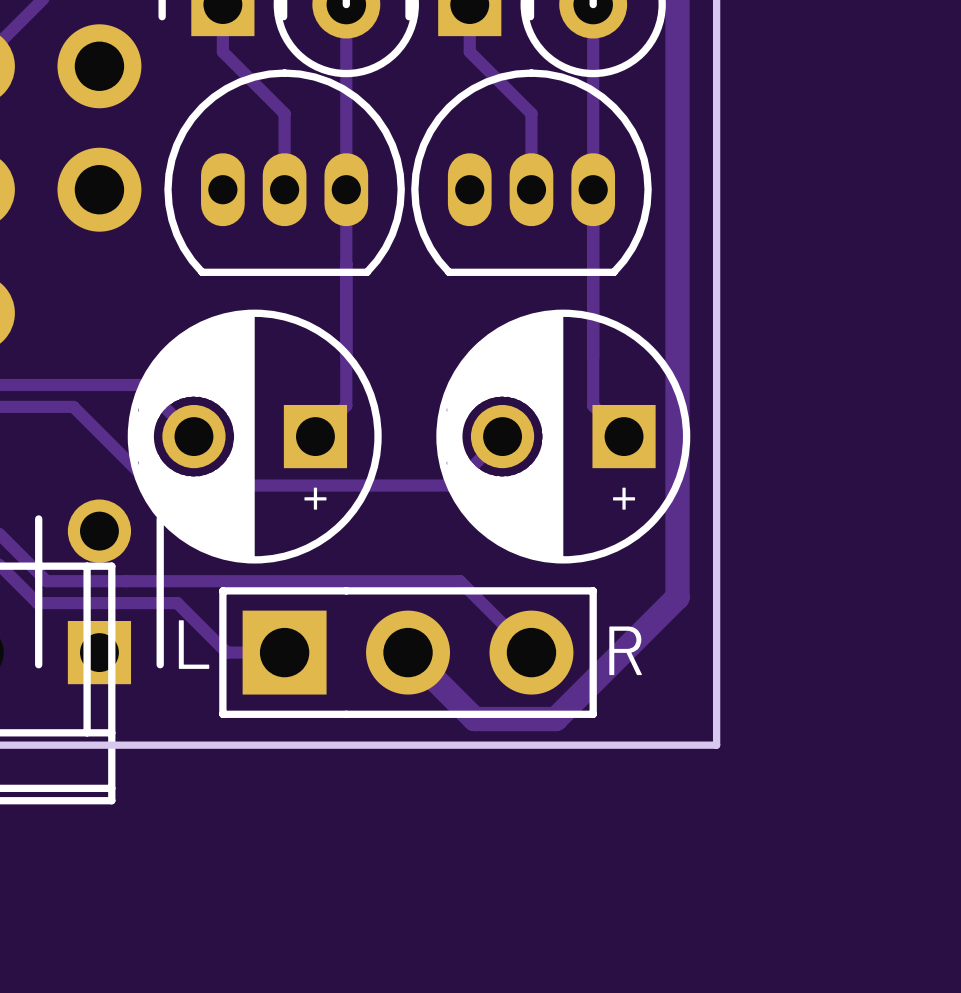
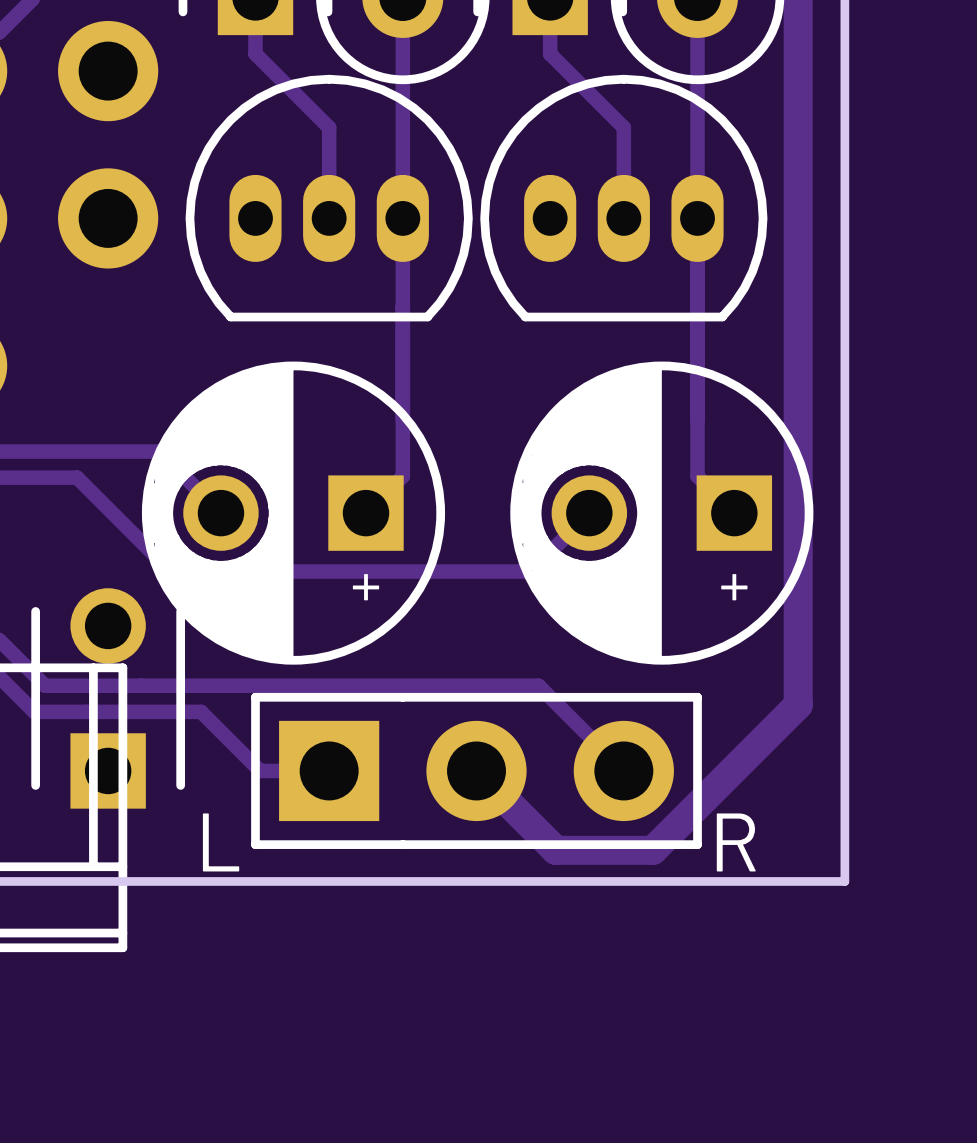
text position: L (194, 644) -> L (221, 842)
text position: R (625, 650) -> R (736, 842)

